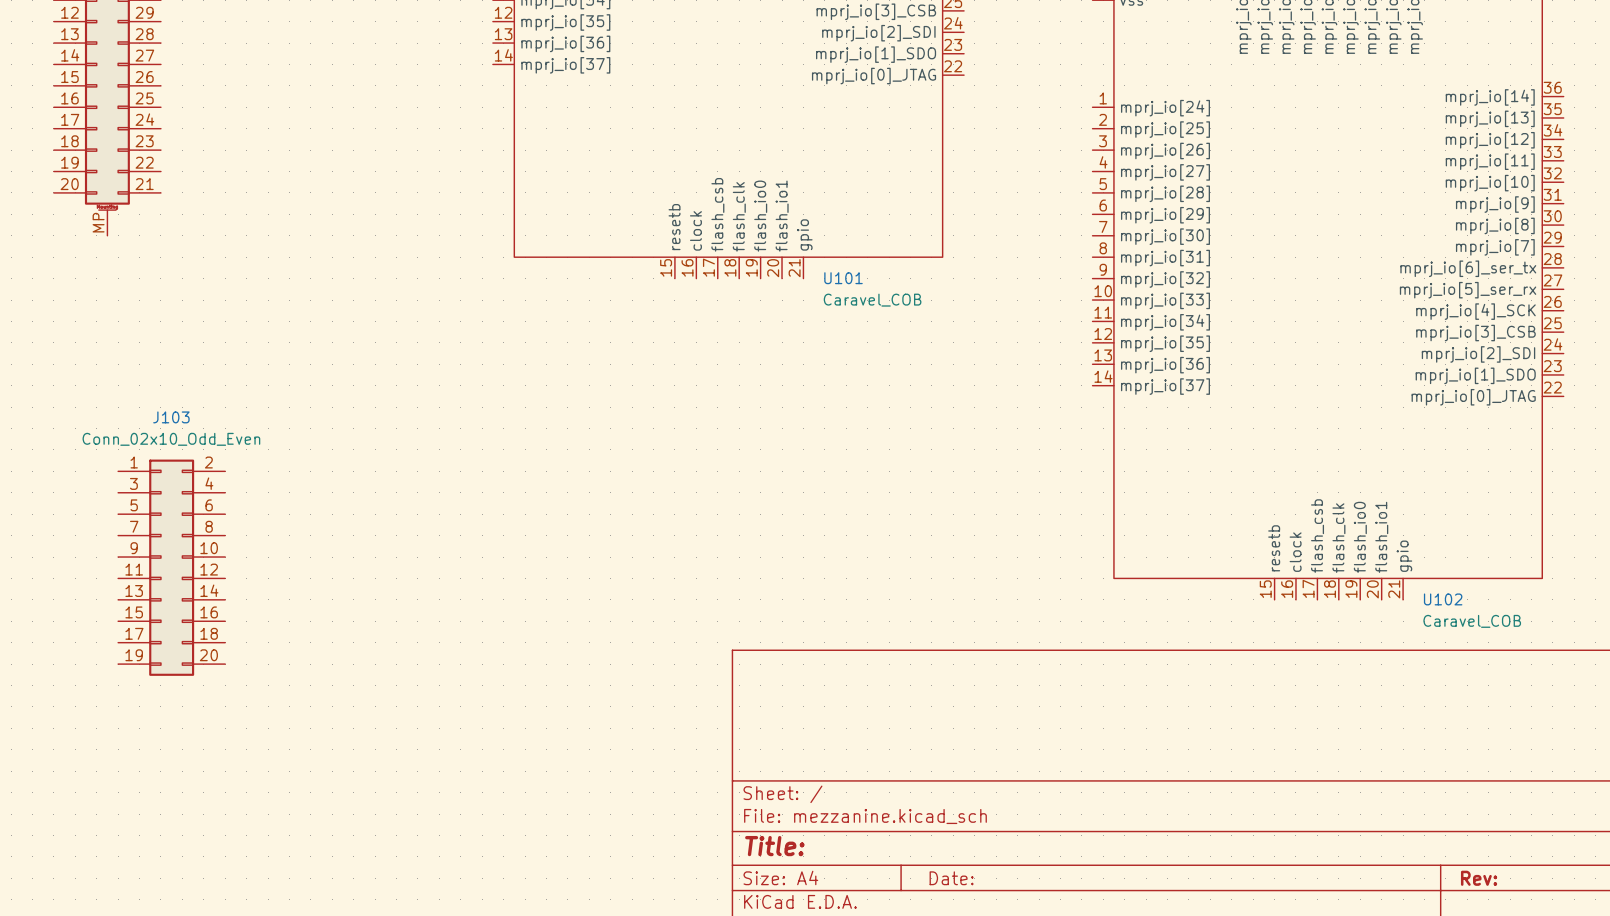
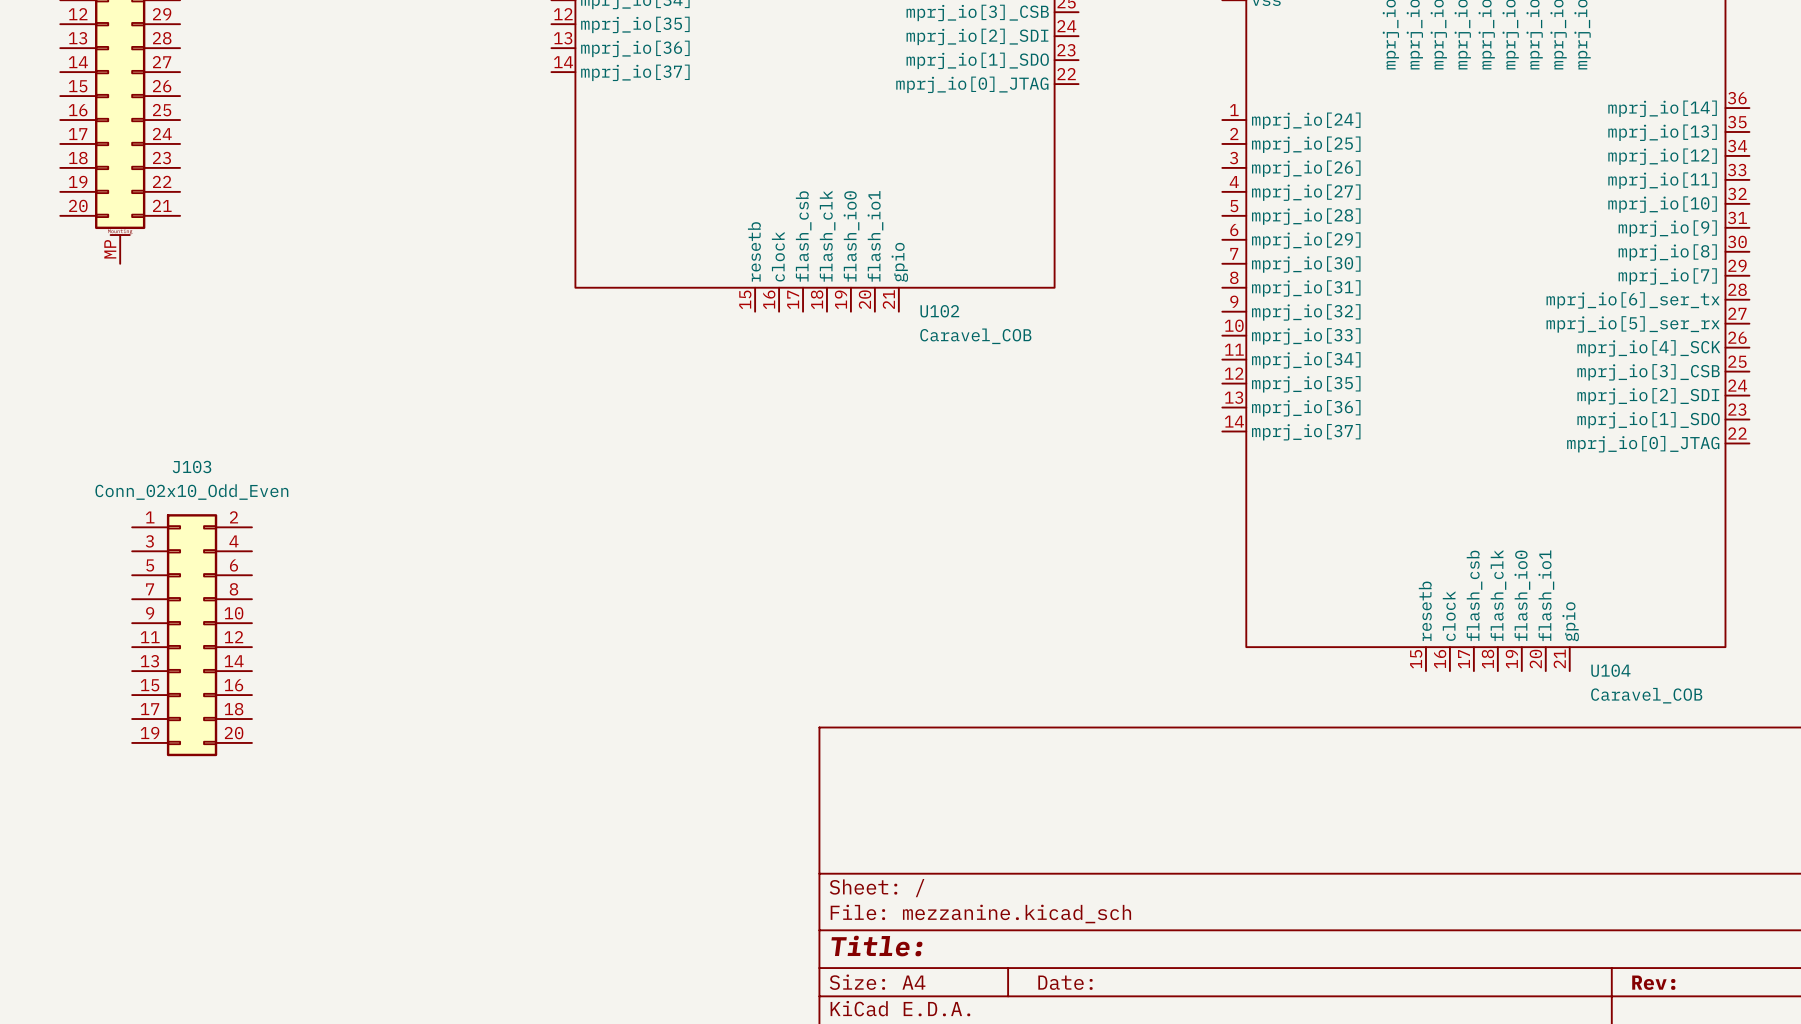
U101 name: U101 (843, 278) -> U102 (939, 311)
U102 name: U102 (1443, 599) -> U104 (1610, 670)

